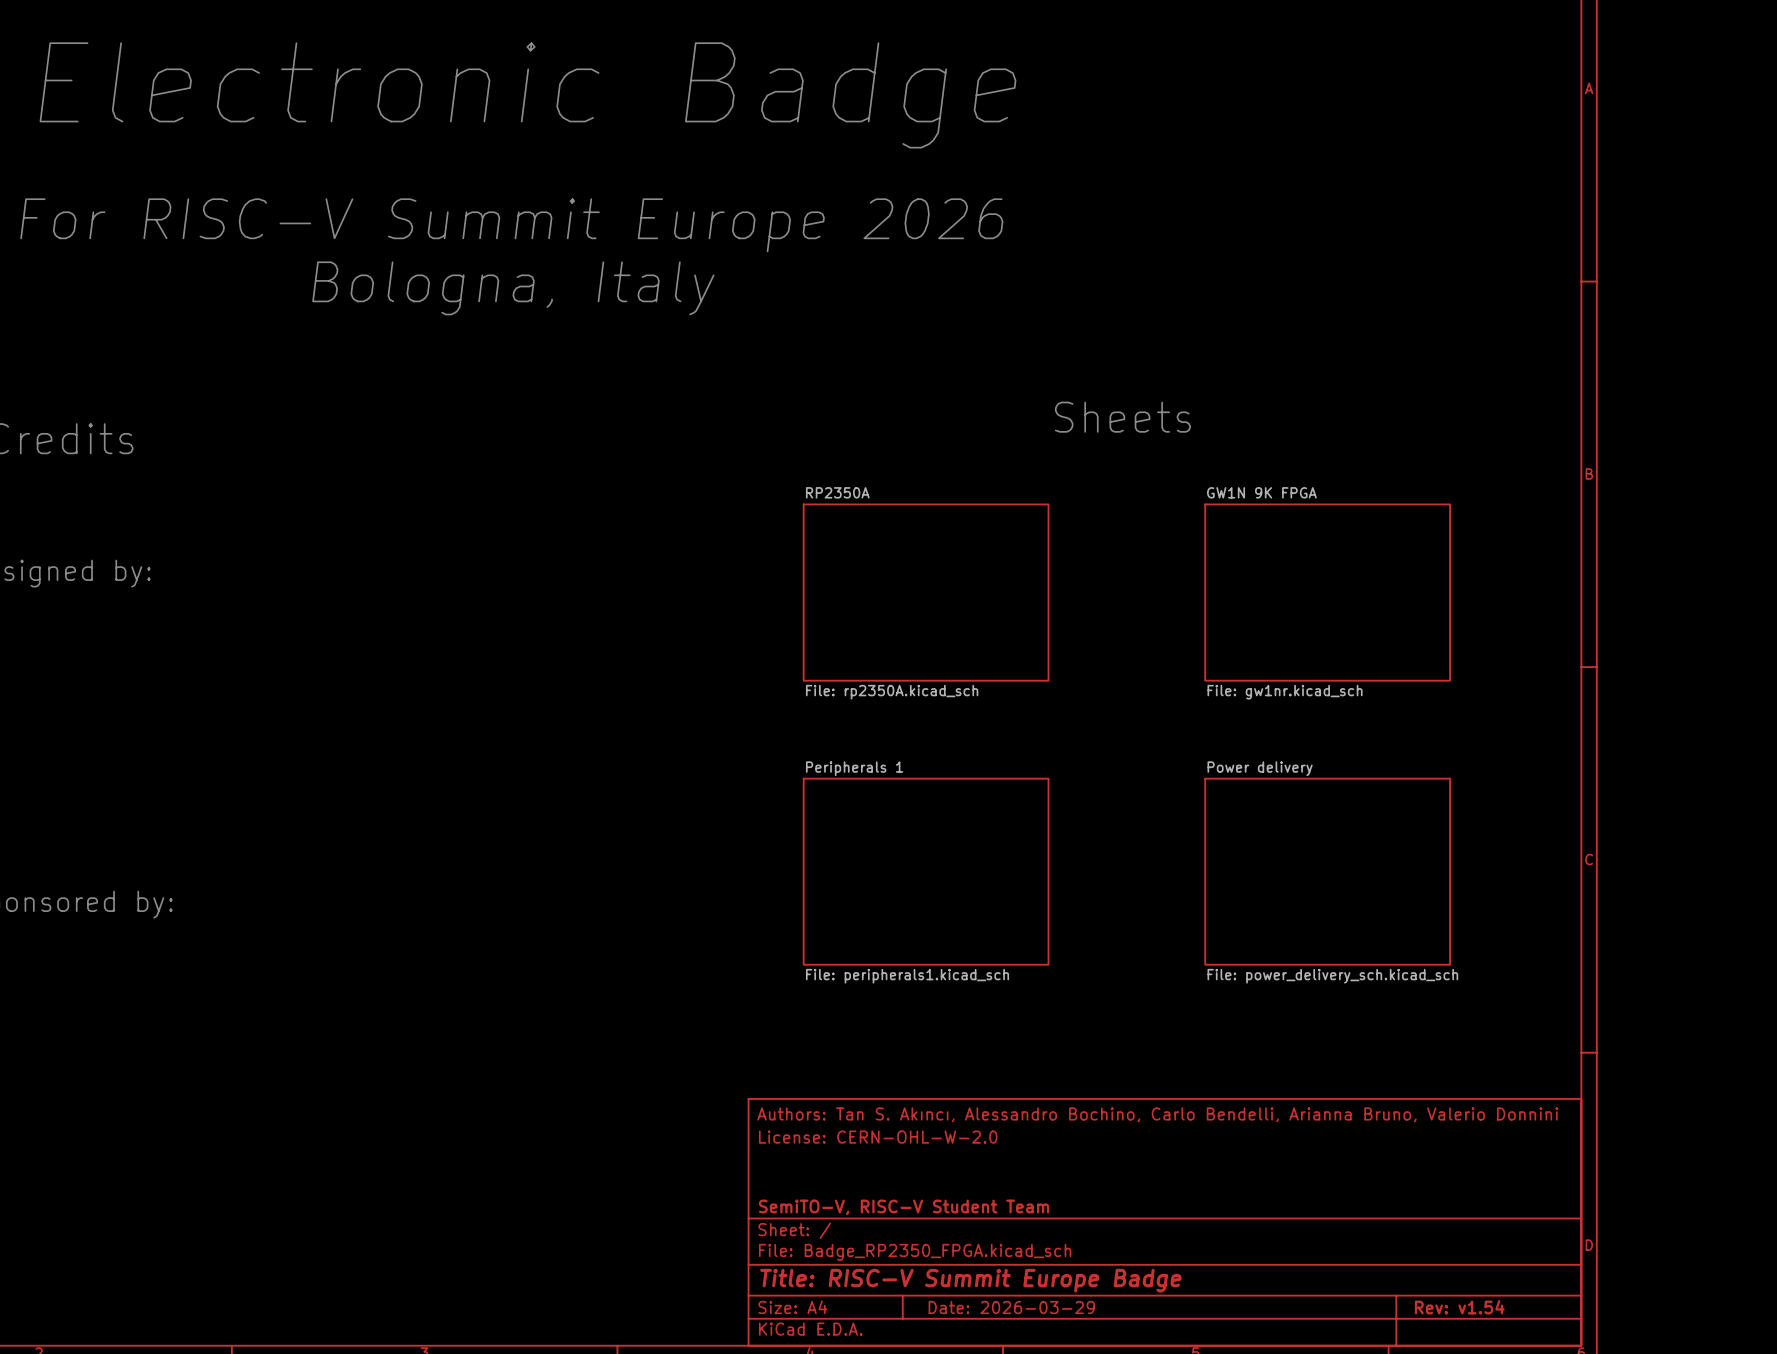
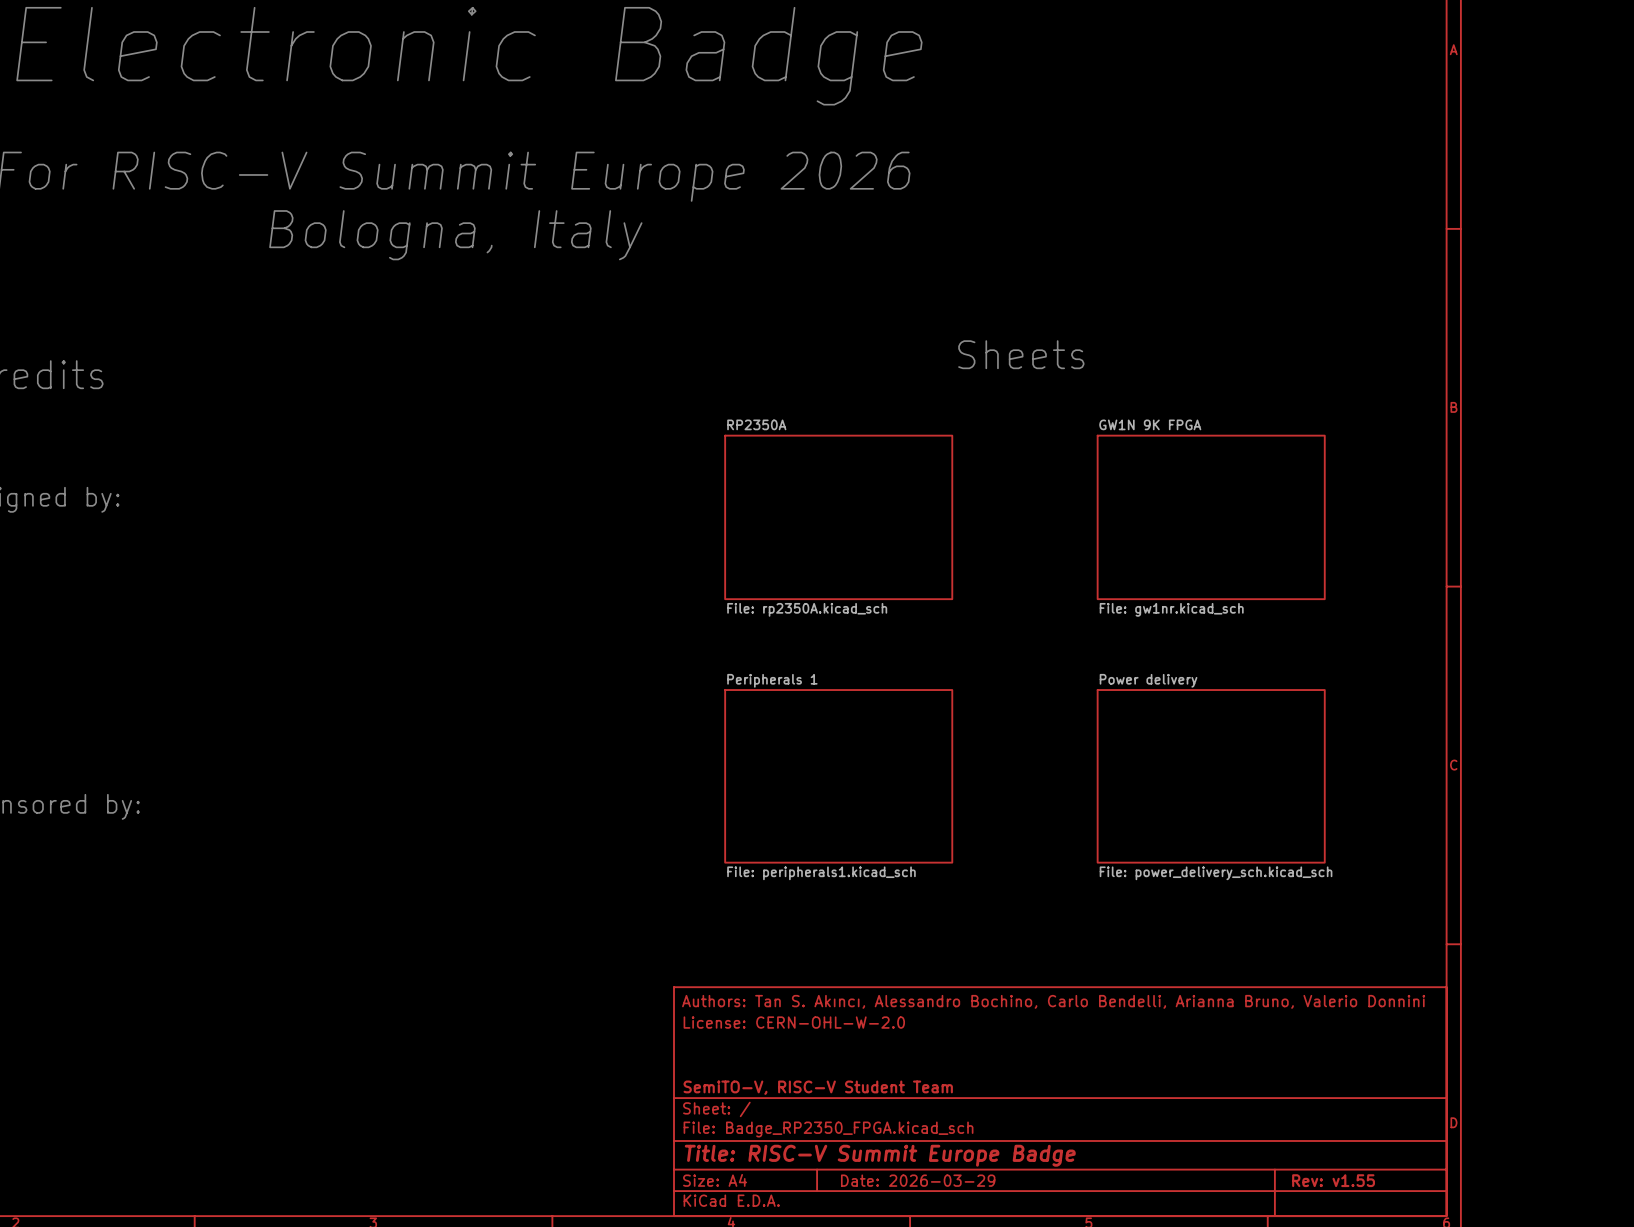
title block: Rev: v1.54 (1459, 1307) -> Rev: v1.55 (1333, 1180)

